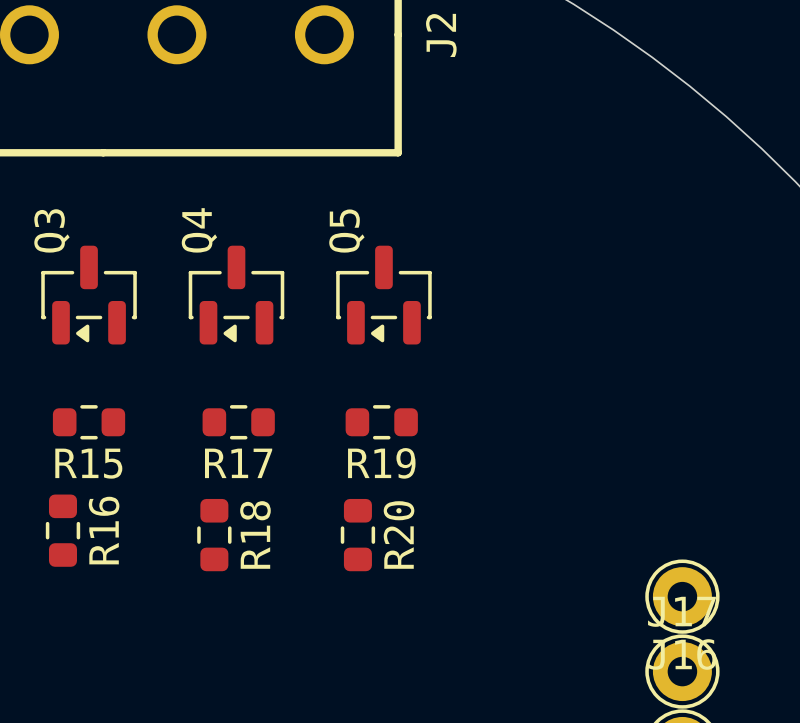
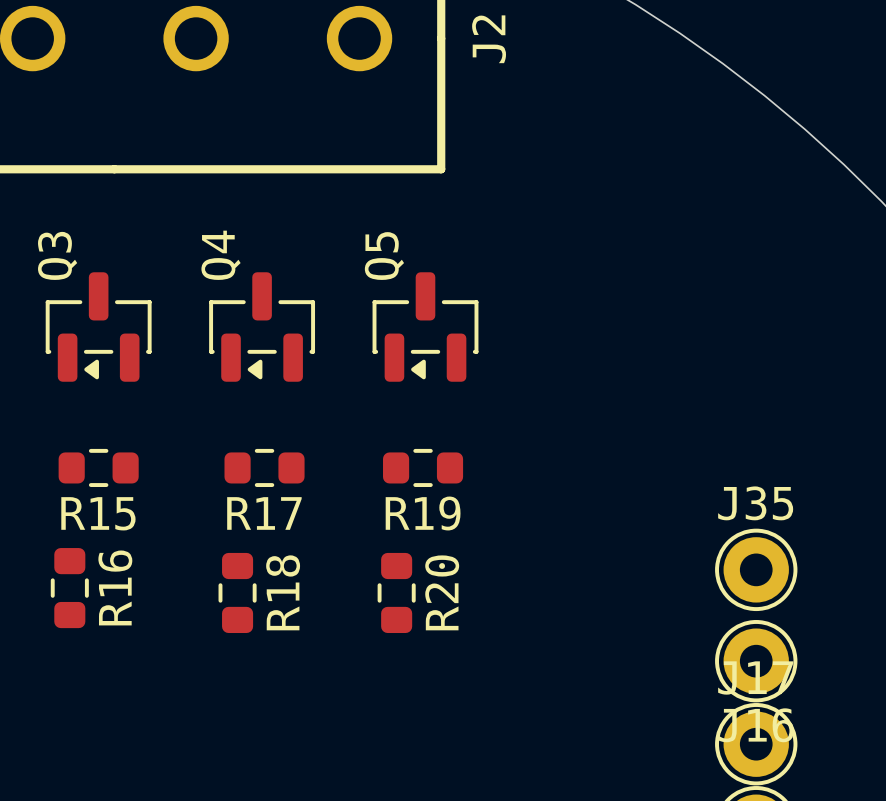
J35: none -> (756, 569)

